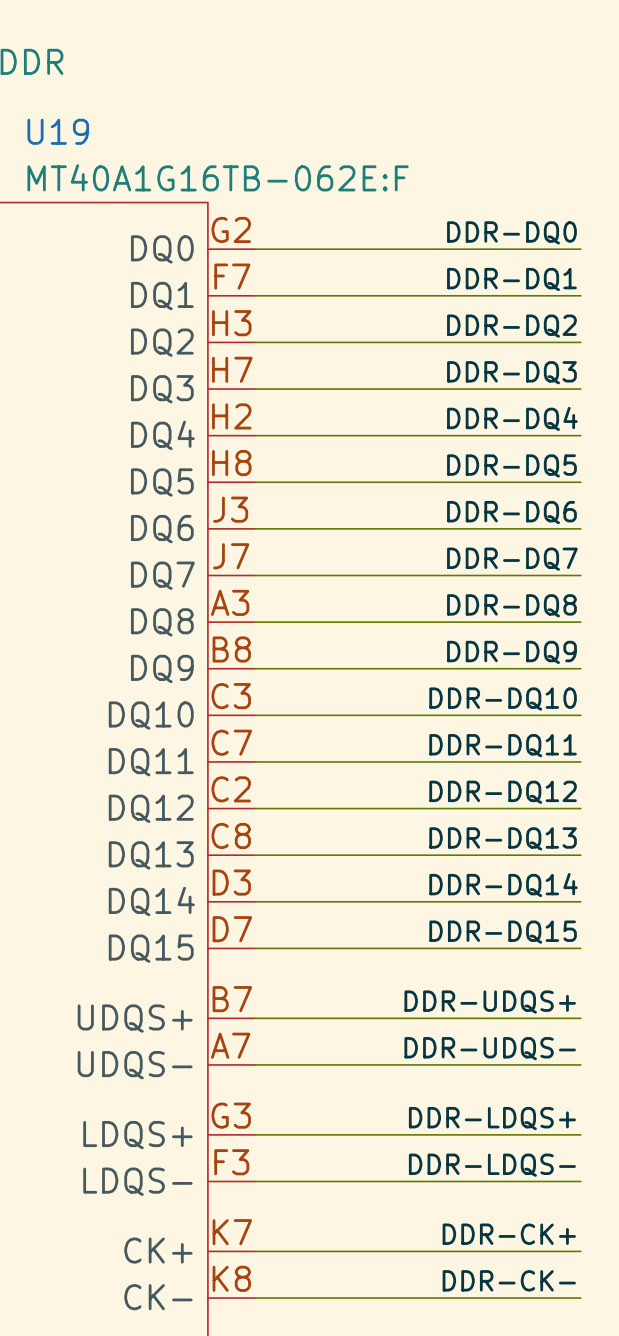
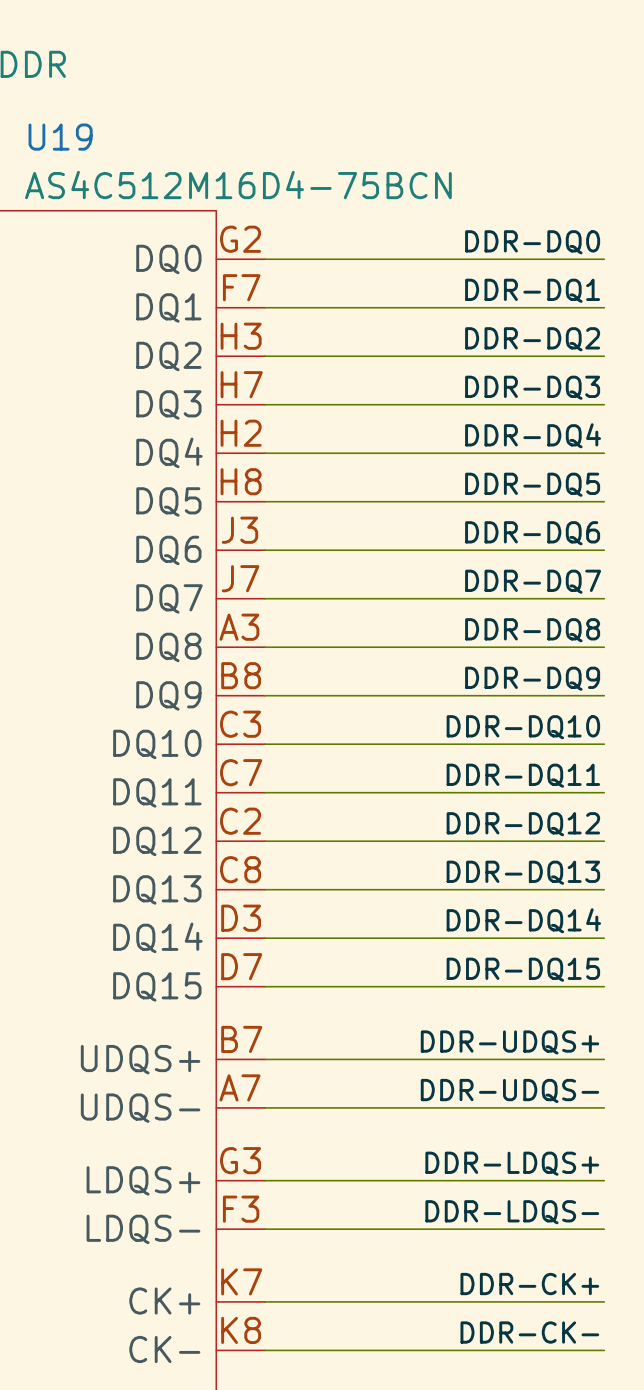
U19 value: MT40A1G16TB-062E:F (218, 177) -> AS4C512M16D4-75BCN (238, 185)

